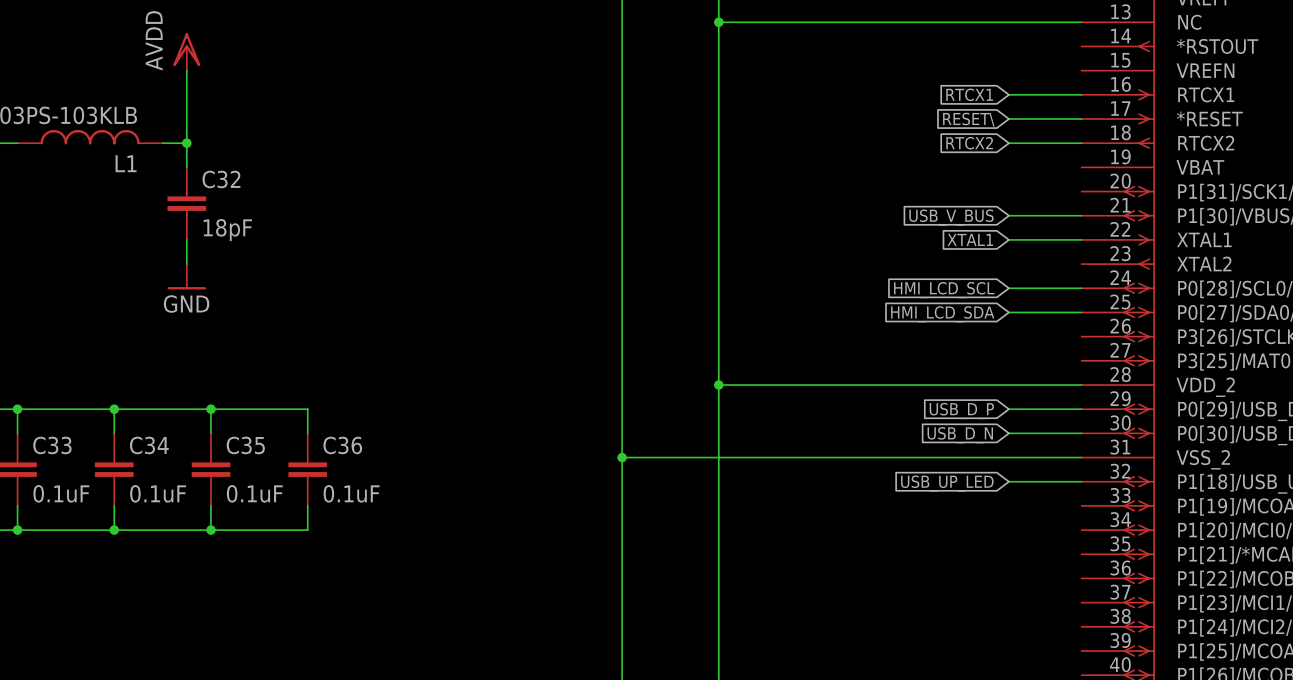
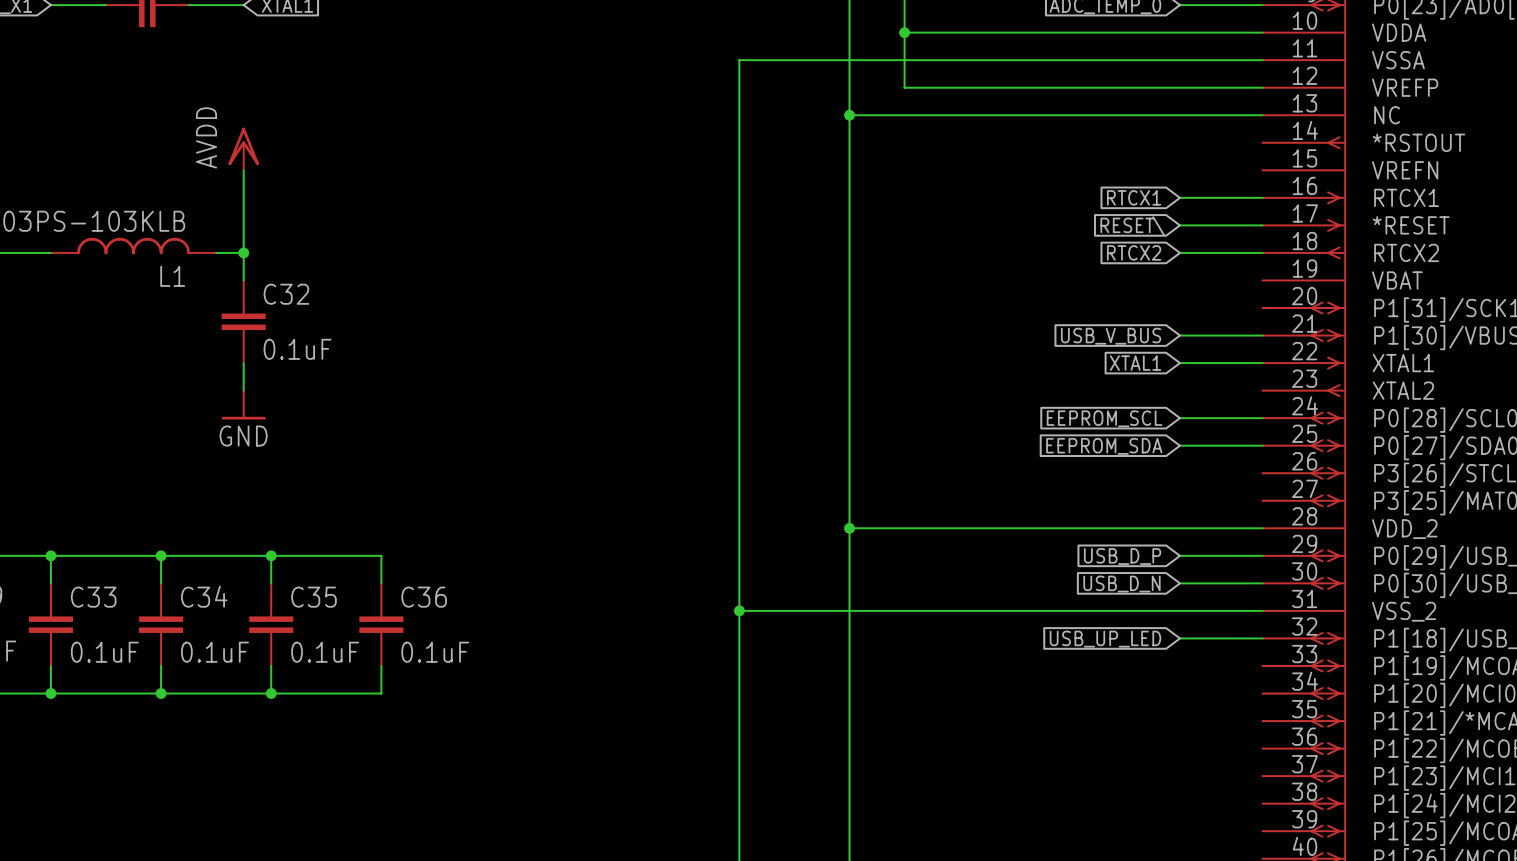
C32 value: 18pF (227, 230) -> 0.1uF (297, 349)
global label: HMI_LCD_SCL (944, 290) -> EEPROM_SCL (1104, 418)
global label: HMI_LCD_SDA (942, 314) -> EEPROM_SDA (1104, 446)

